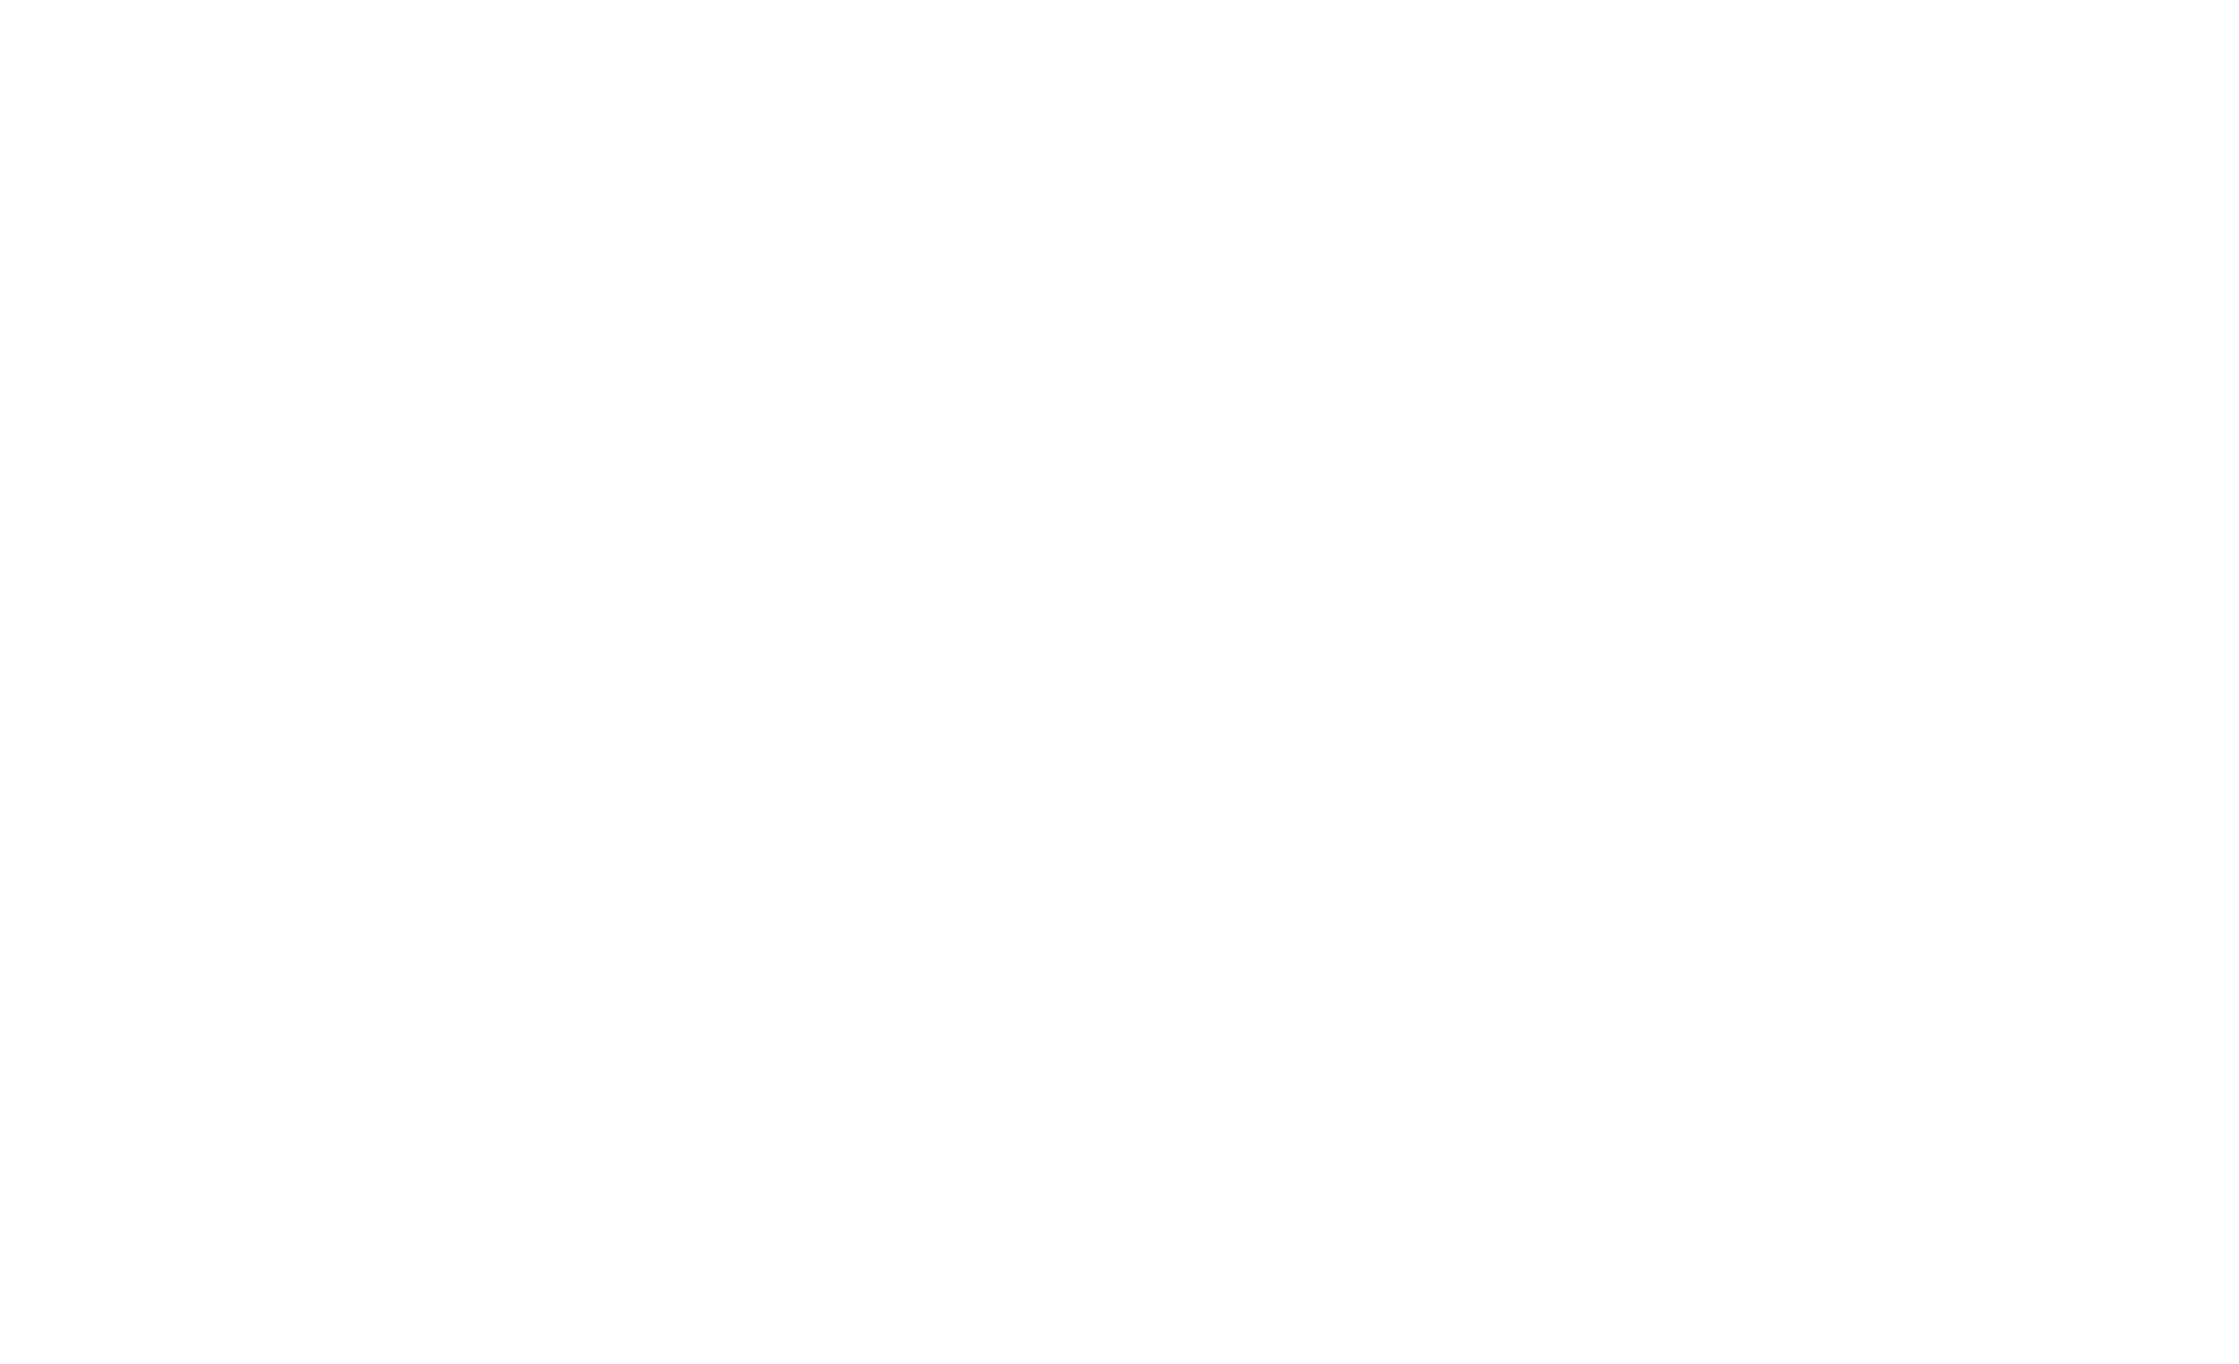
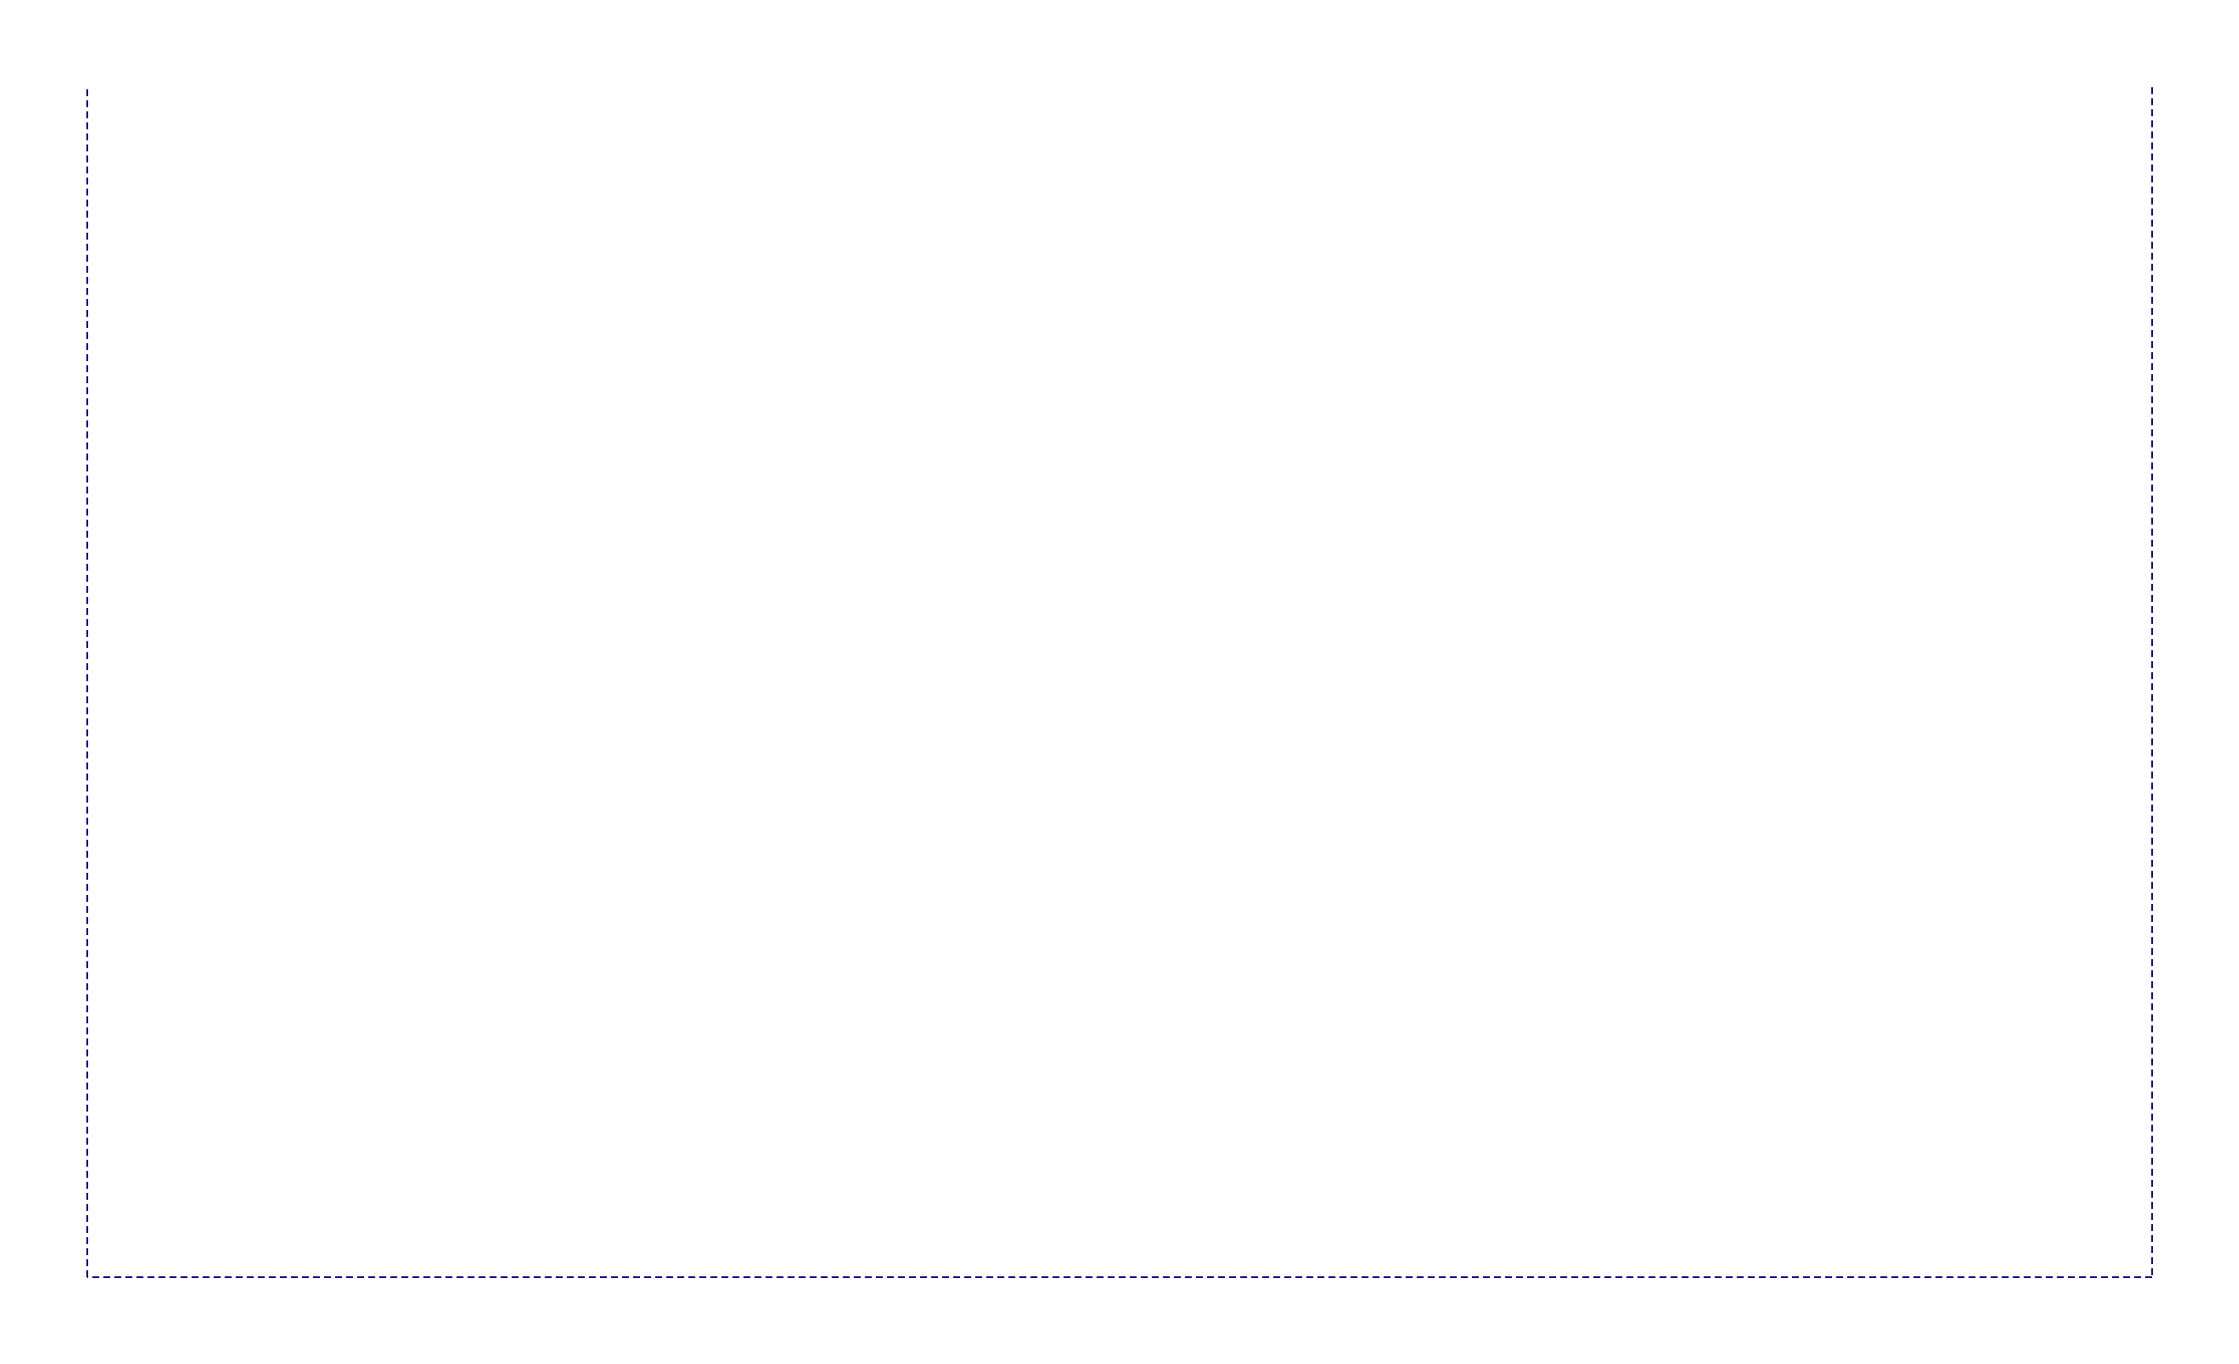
line: none -> (87, 87) (87, 1277) (2152, 1277) (2152, 87)

